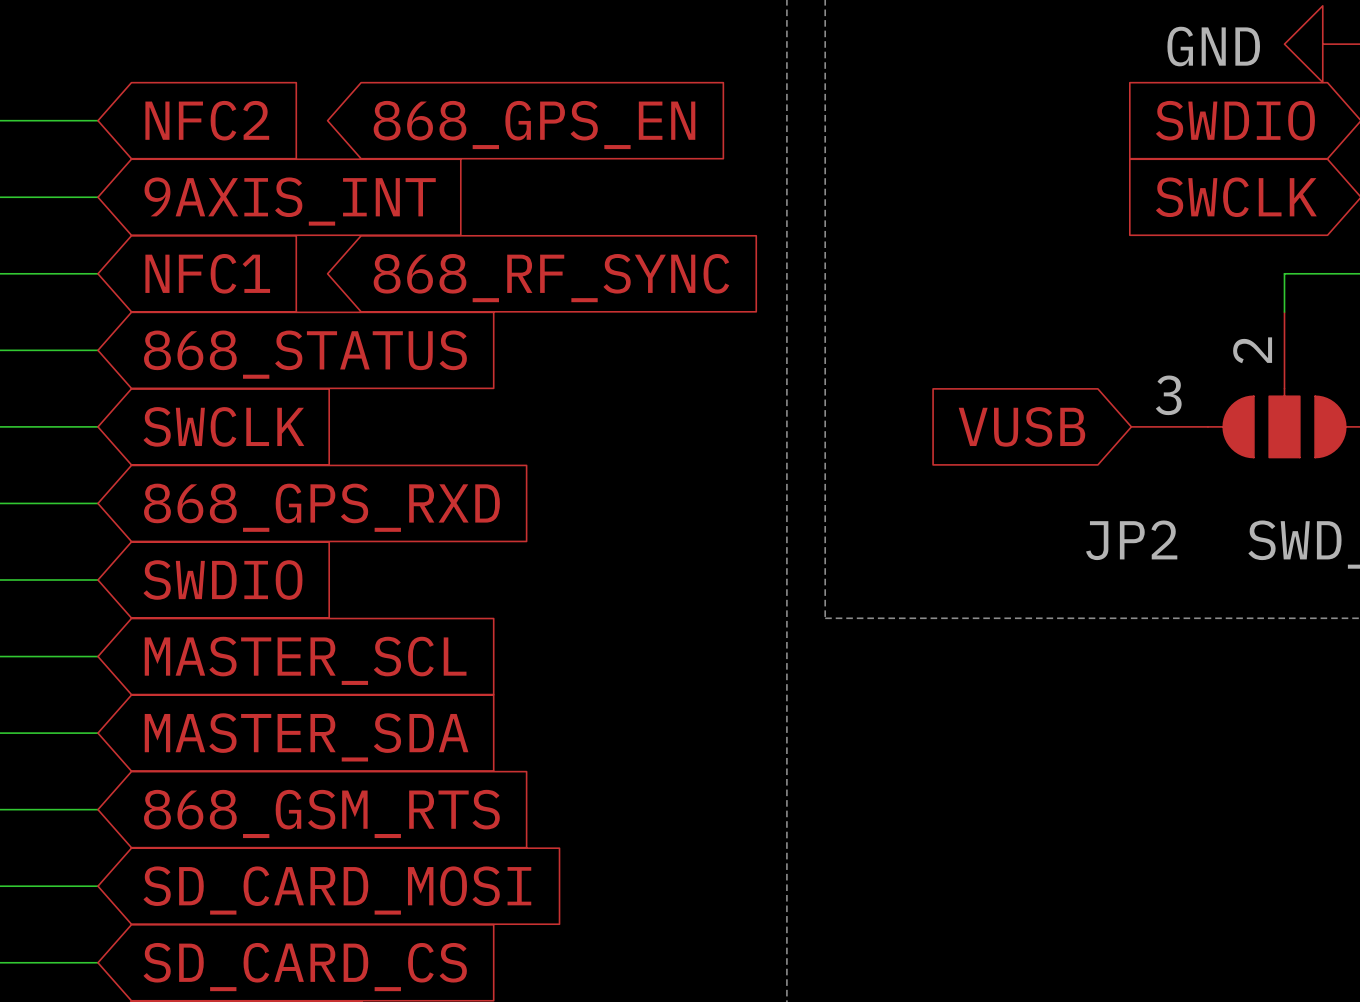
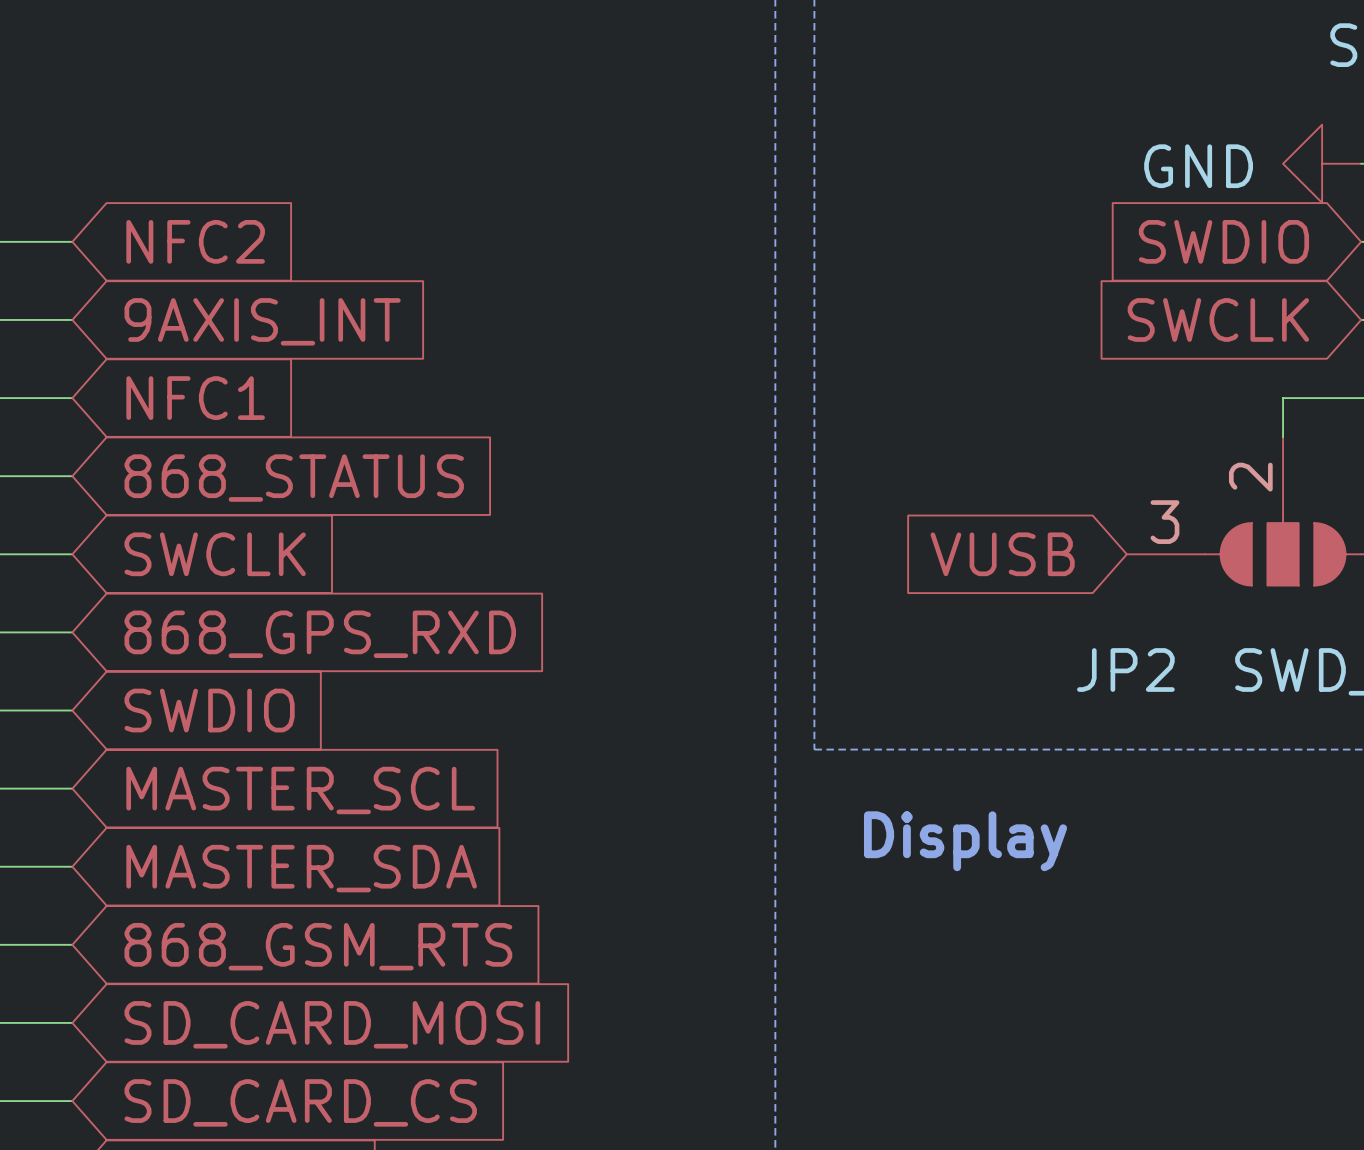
global label: 868_GPS_EN (534, 124) -> none
global label: 868_RF_SYNC (551, 278) -> none
text: none -> Display (965, 841)

